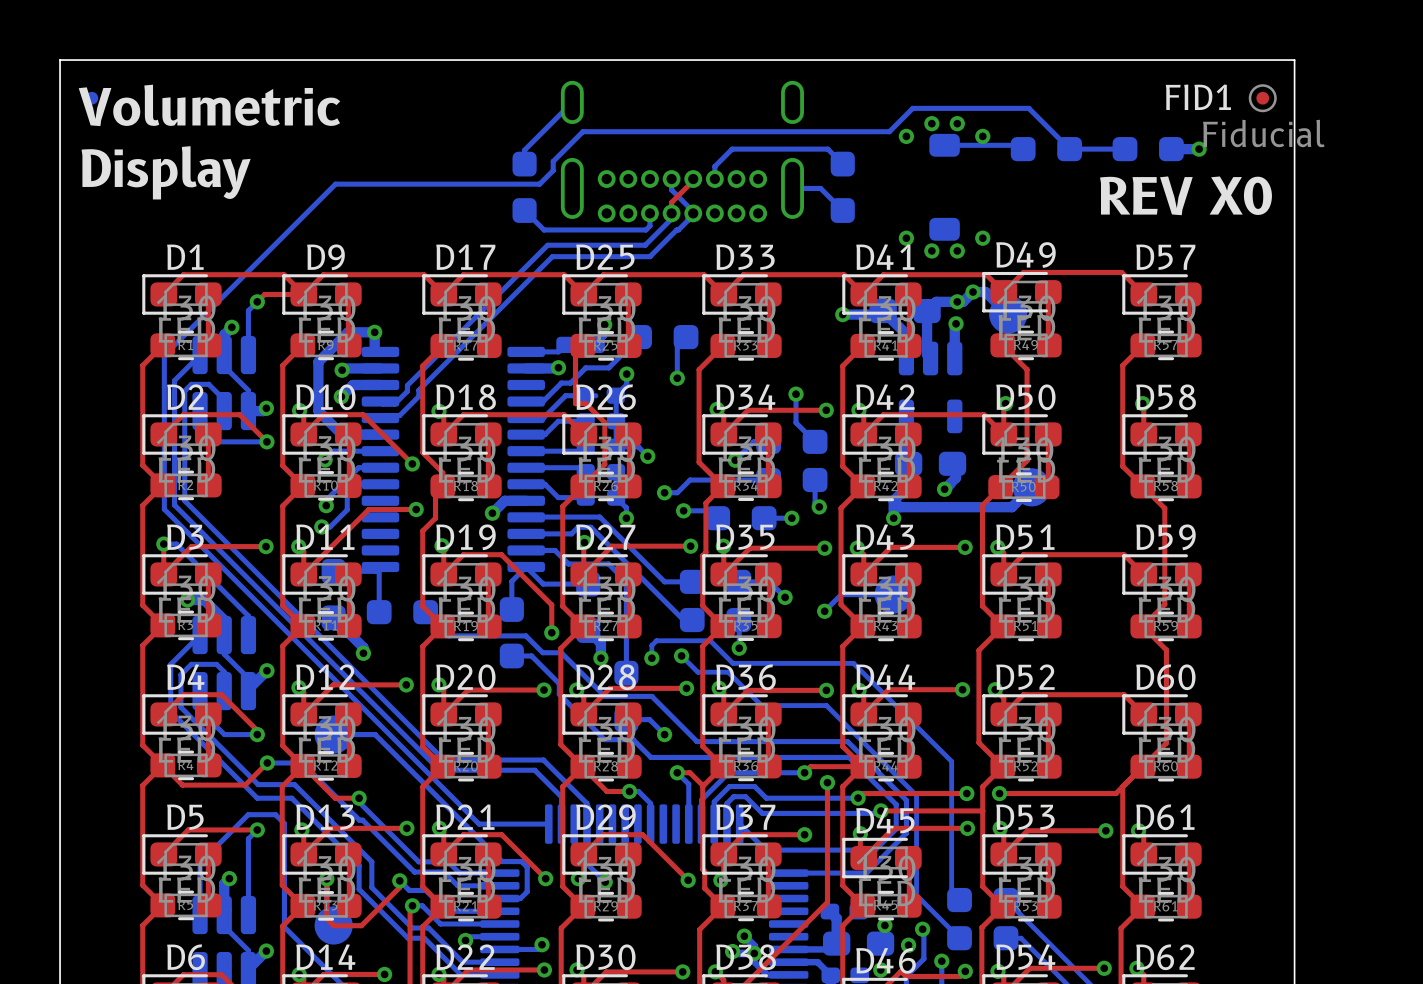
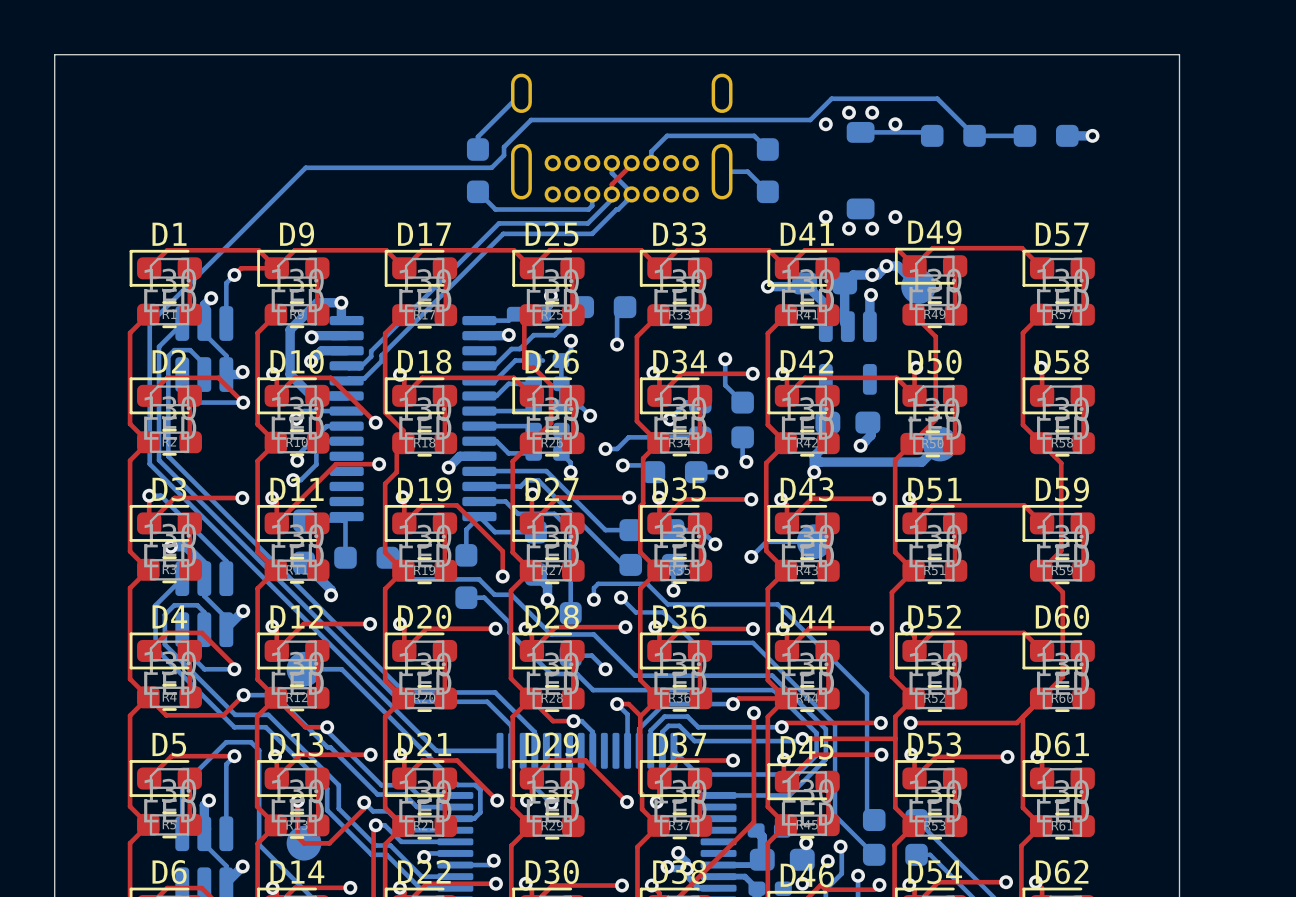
part: (91, 98) -> none
FID1: Fiducial (1262, 98) -> none
text: Volumetric (209, 105) -> none
text: Display (166, 172) -> none
text: REV X0 (1185, 195) -> none

